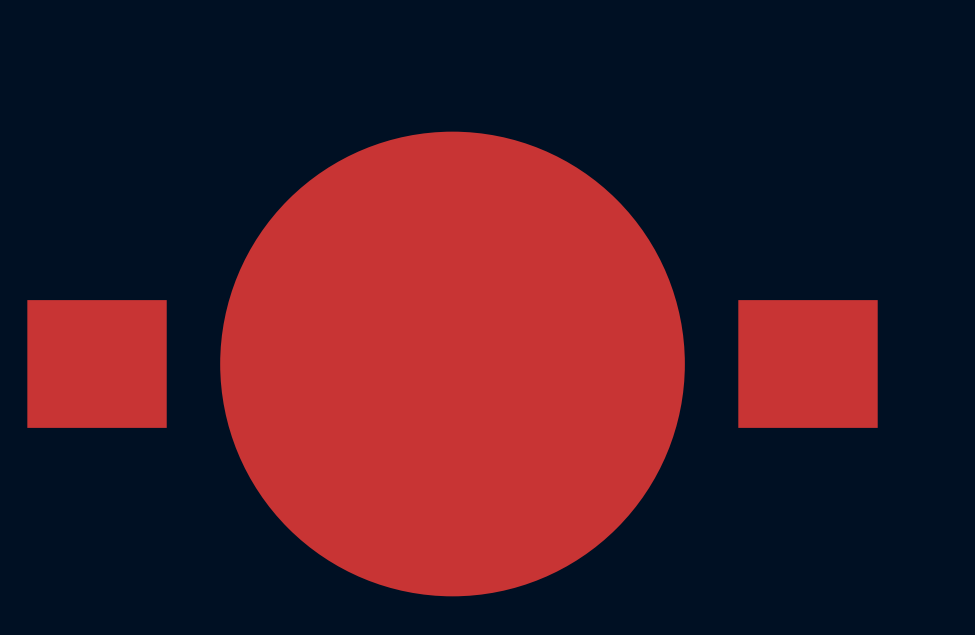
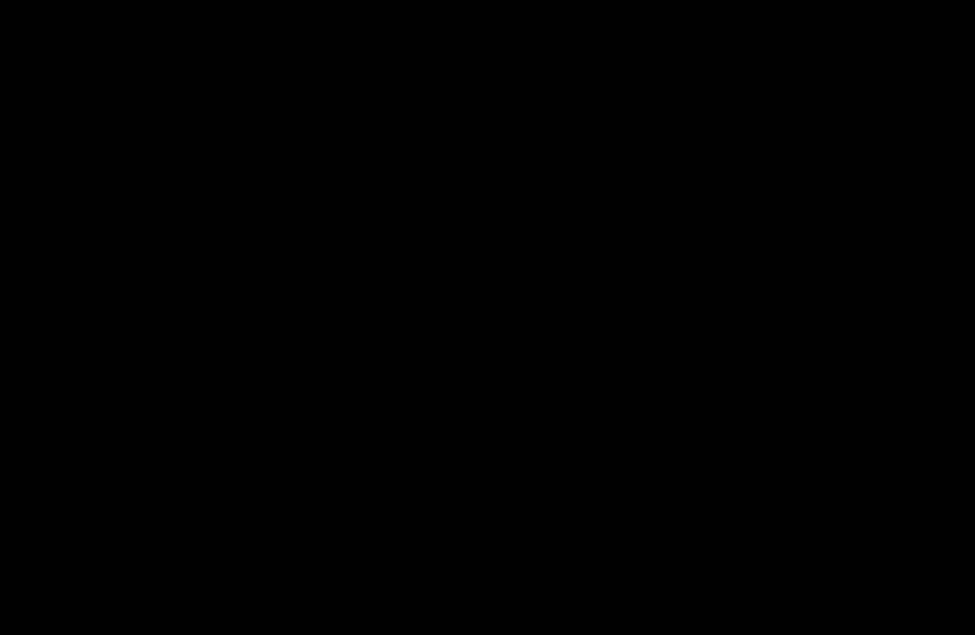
part: (452, 363) -> none

